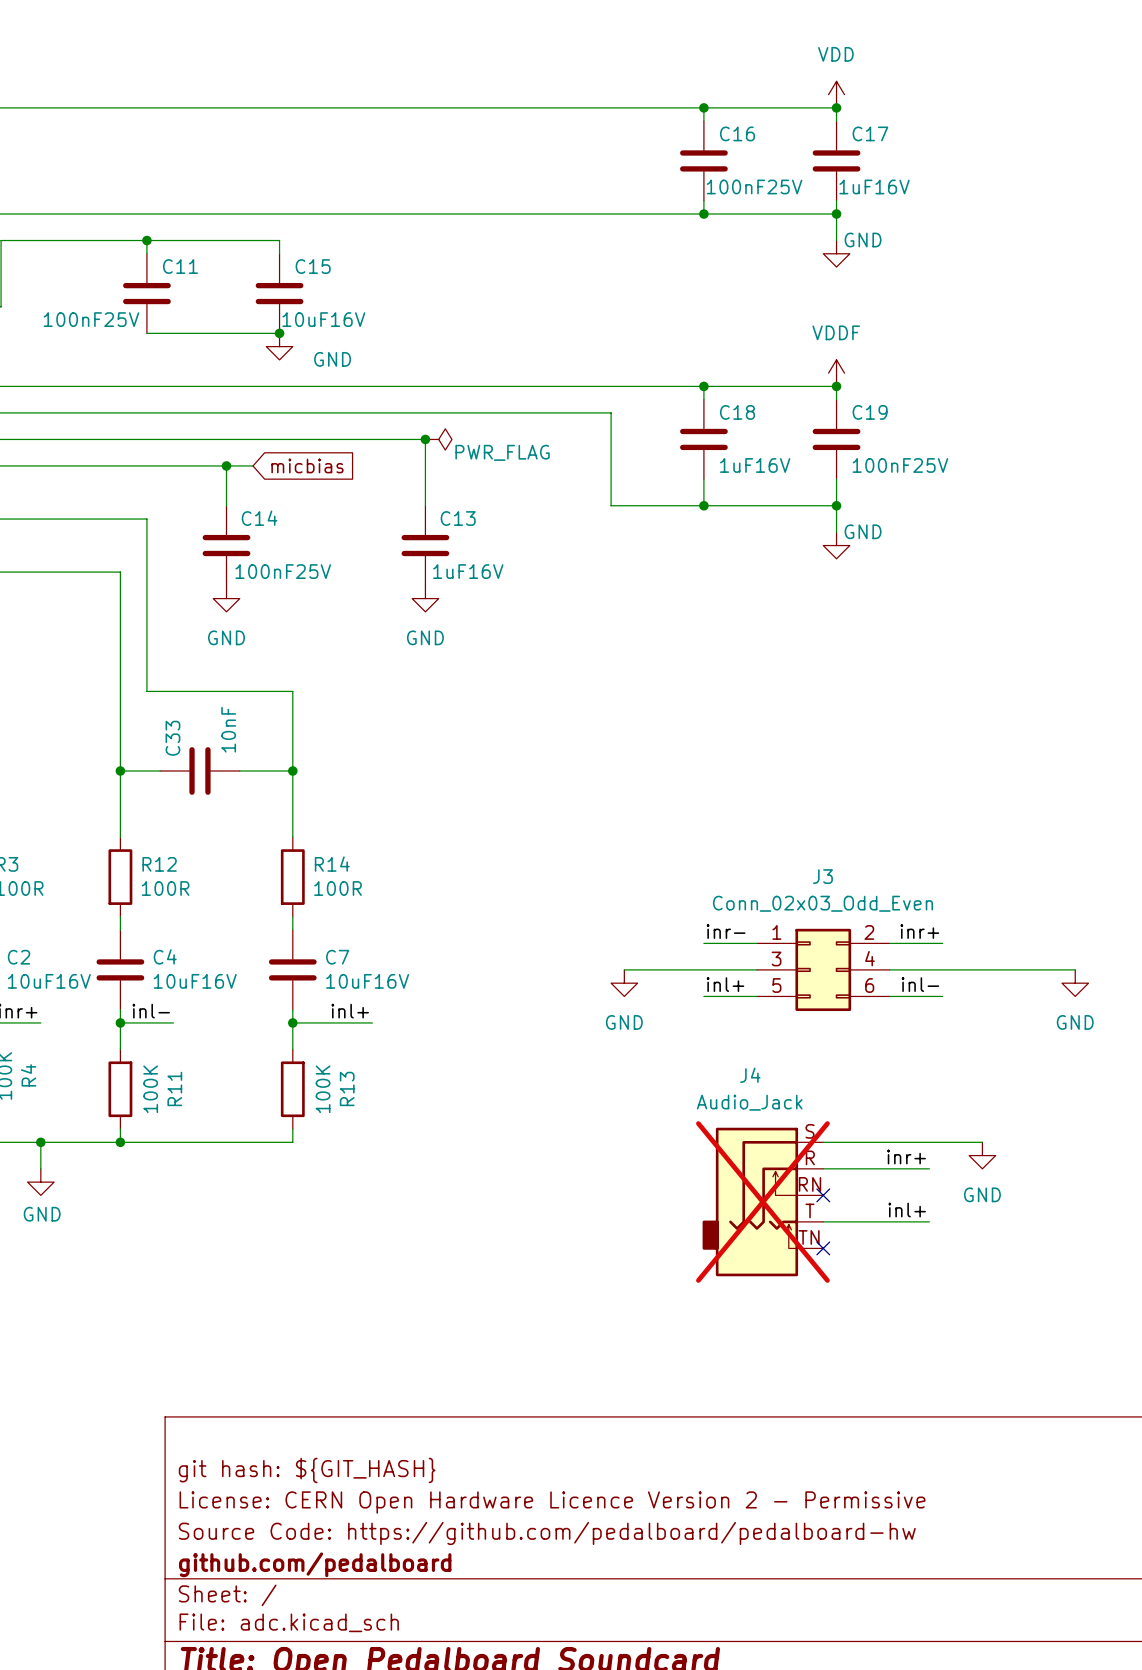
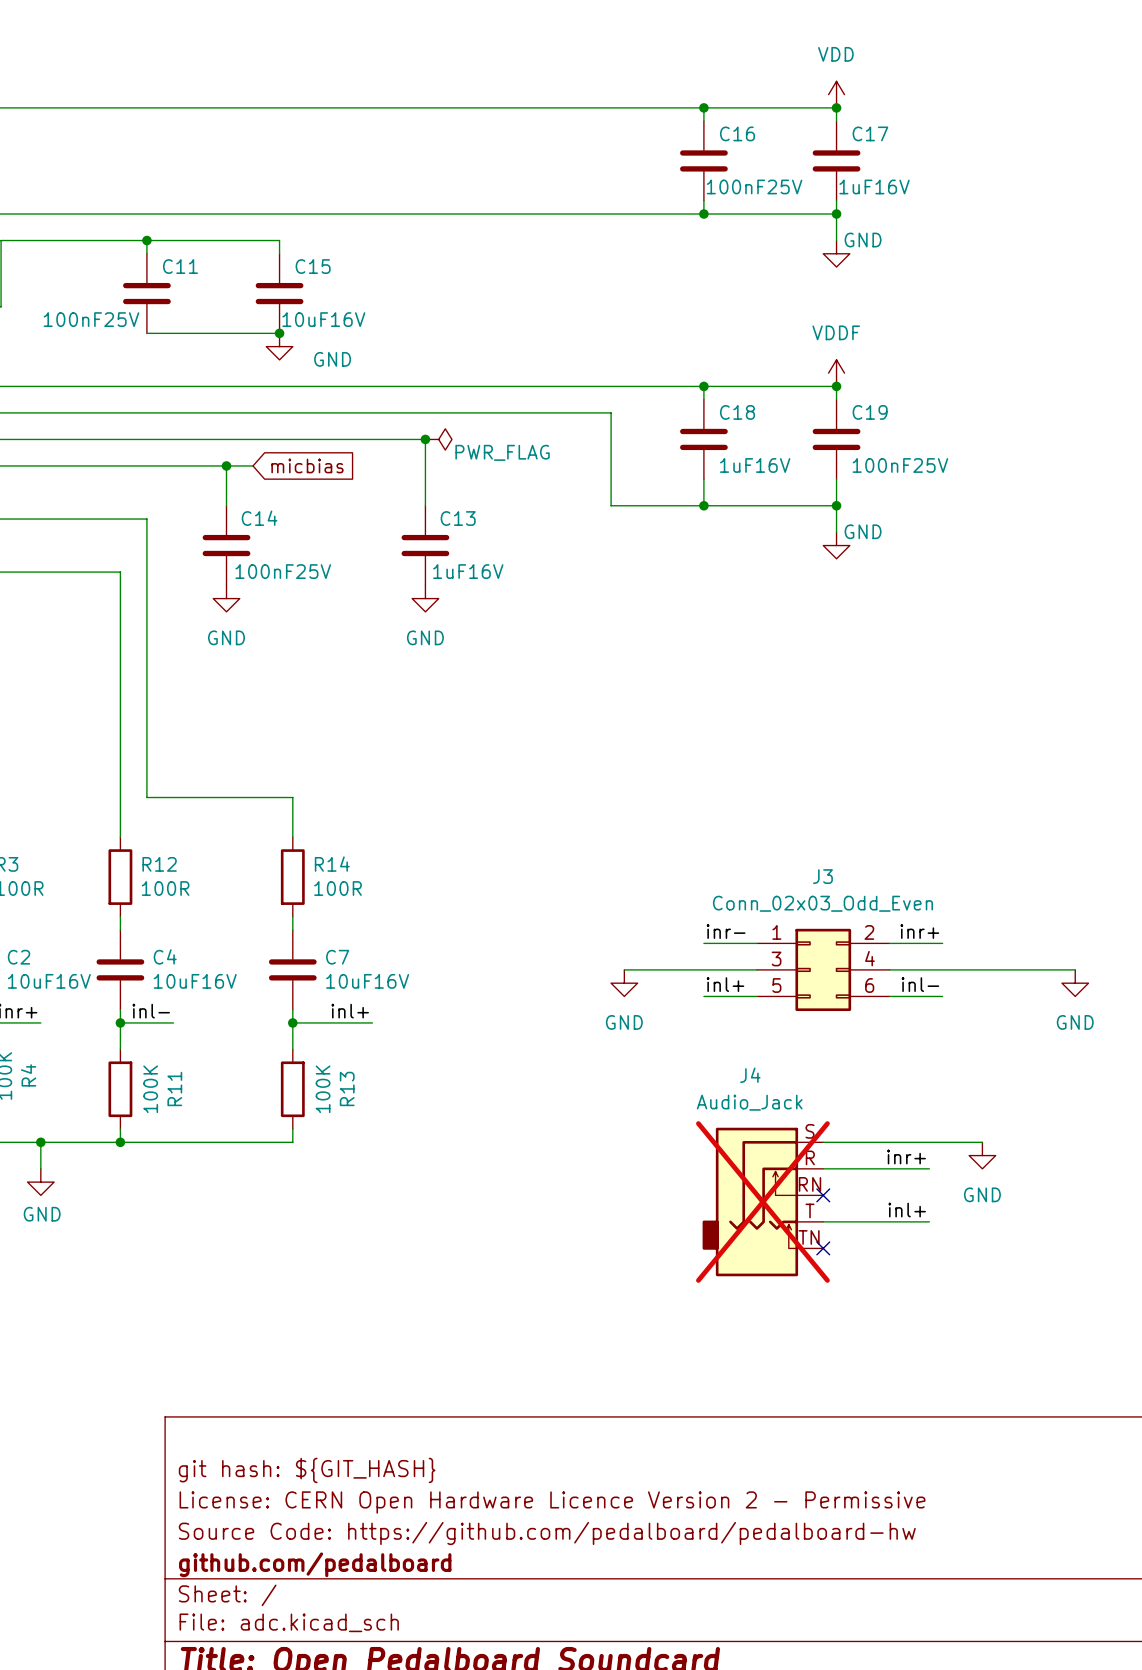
wire: (146, 691) (292, 691) (292, 797) -> (146, 691) (146, 797) (292, 797)
wire: (120, 770) (160, 770) -> none
junction: (120, 770) -> none
C33: 10nF (199, 770) -> none
wire: (239, 770) (292, 770) -> none
junction: (292, 770) -> none

